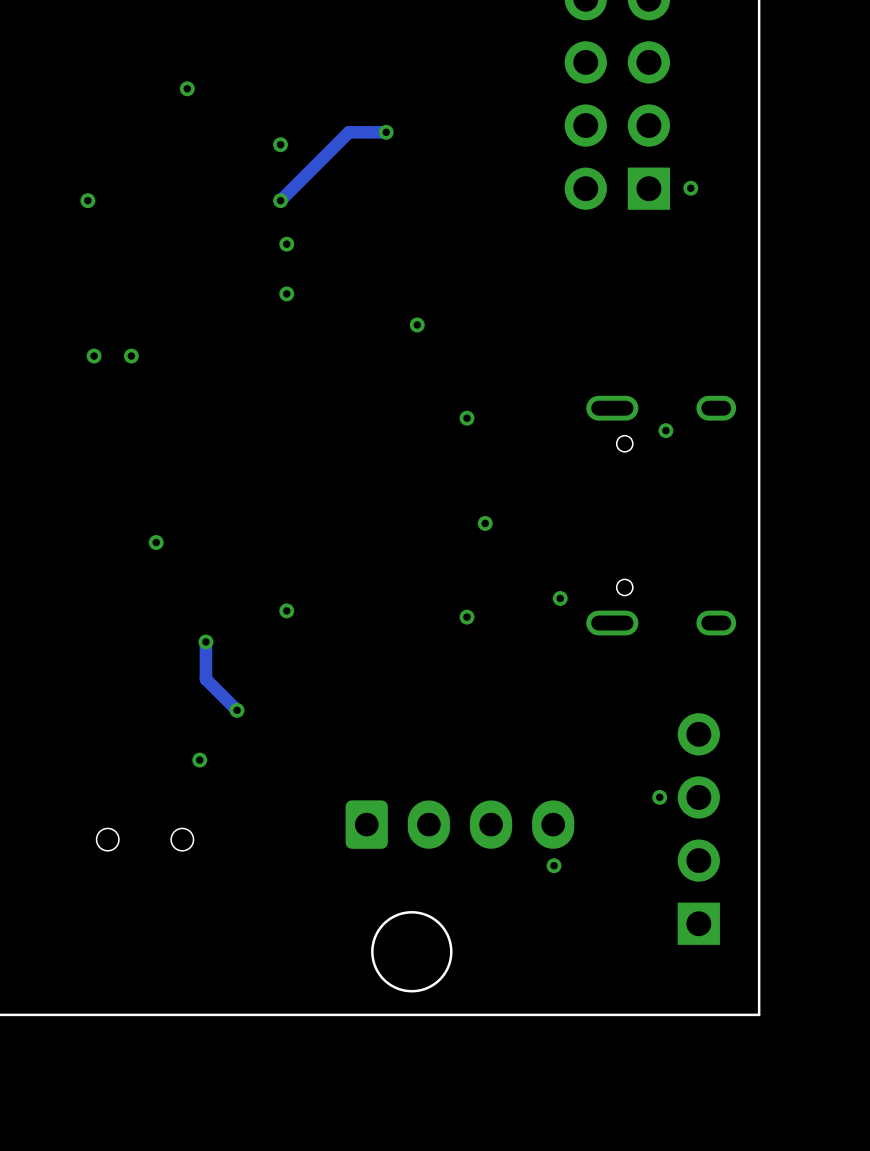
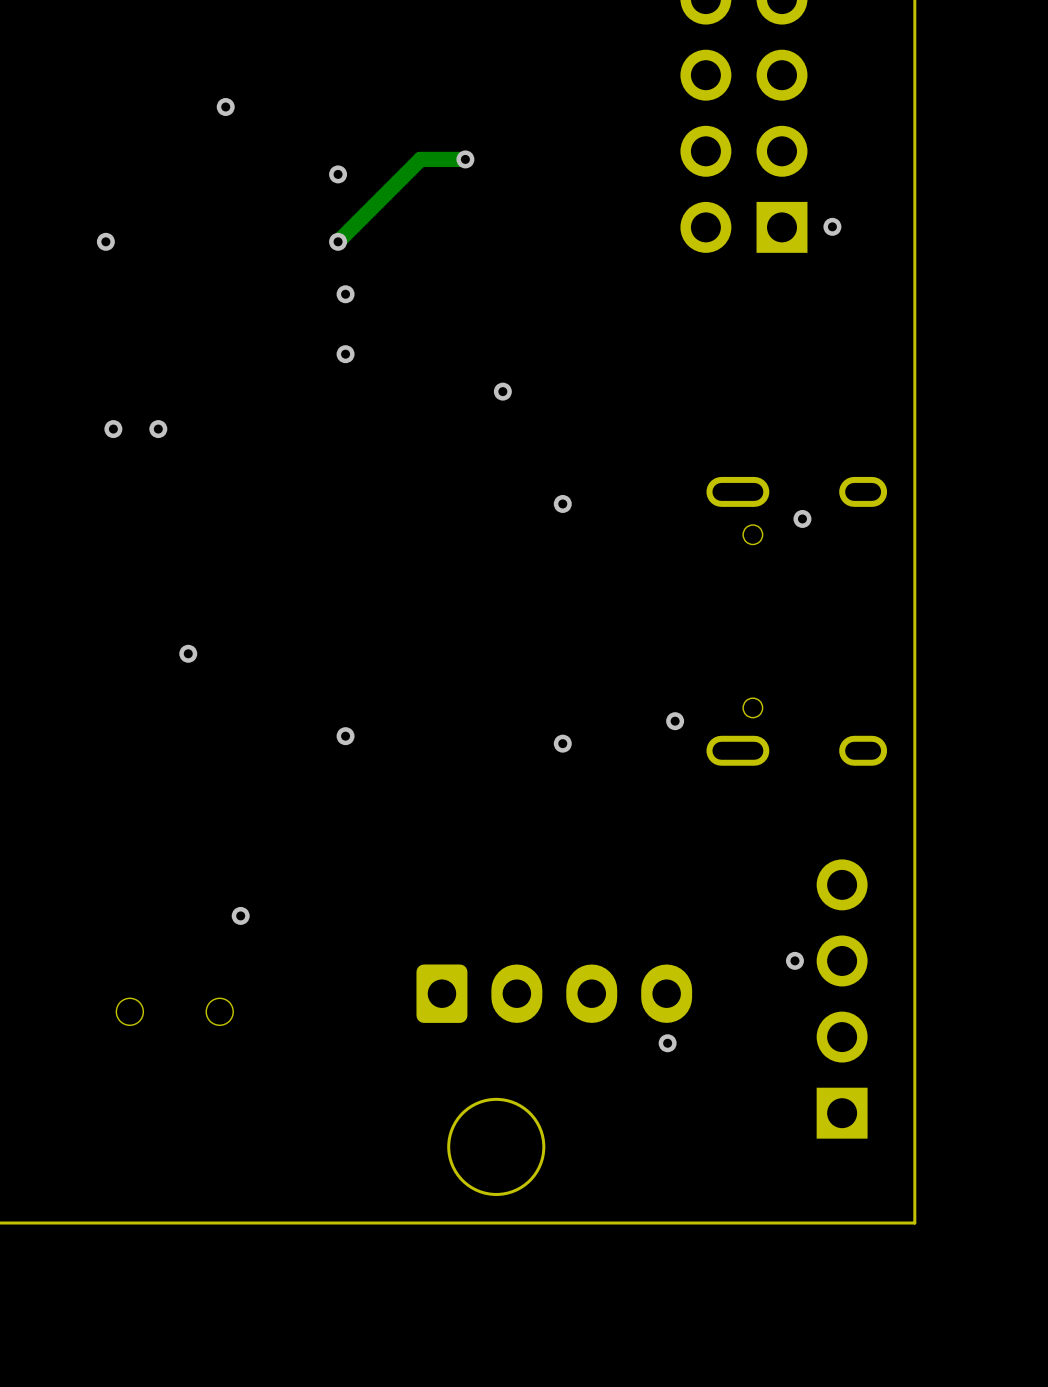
via: (485, 523) -> none
track: (205, 641) (205, 679) (237, 710) -> none
via: (205, 641) -> none
via: (237, 710) -> none

